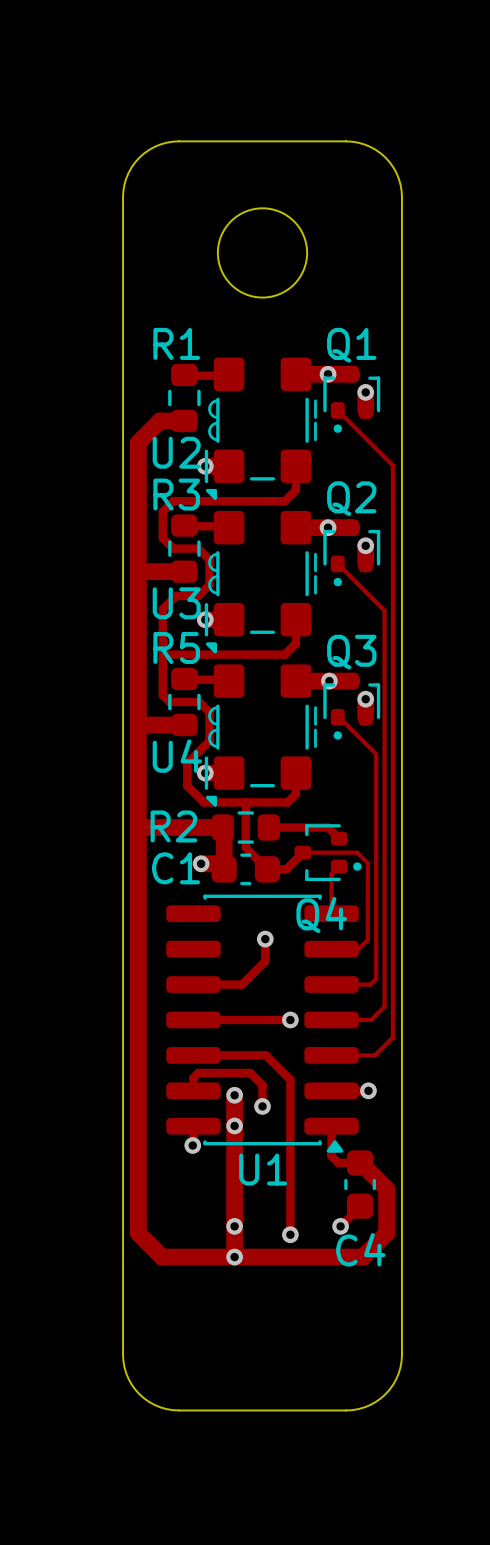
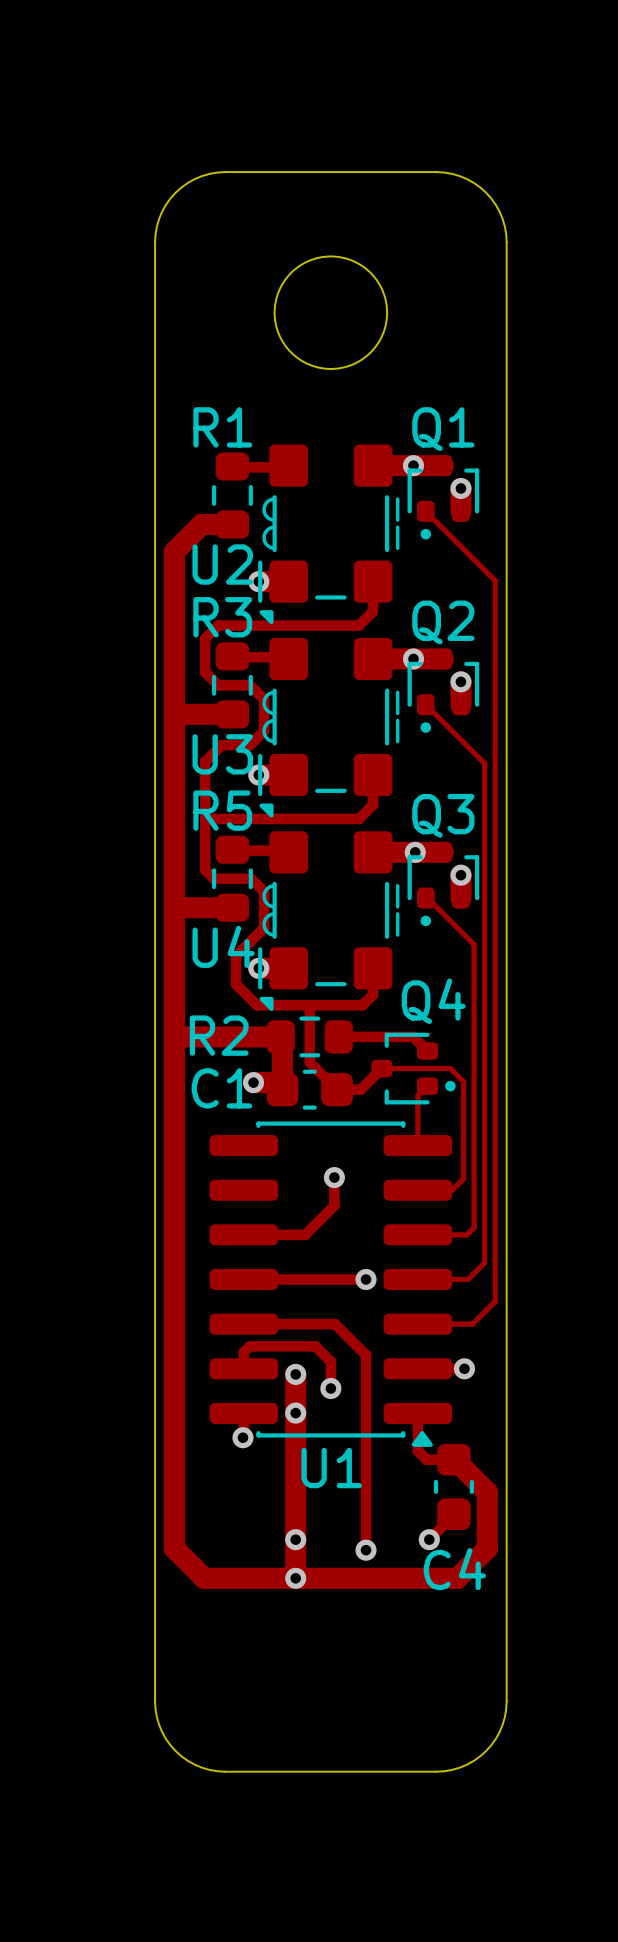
Q4 name position: Q4 (321, 915) -> Q4 (433, 1001)

